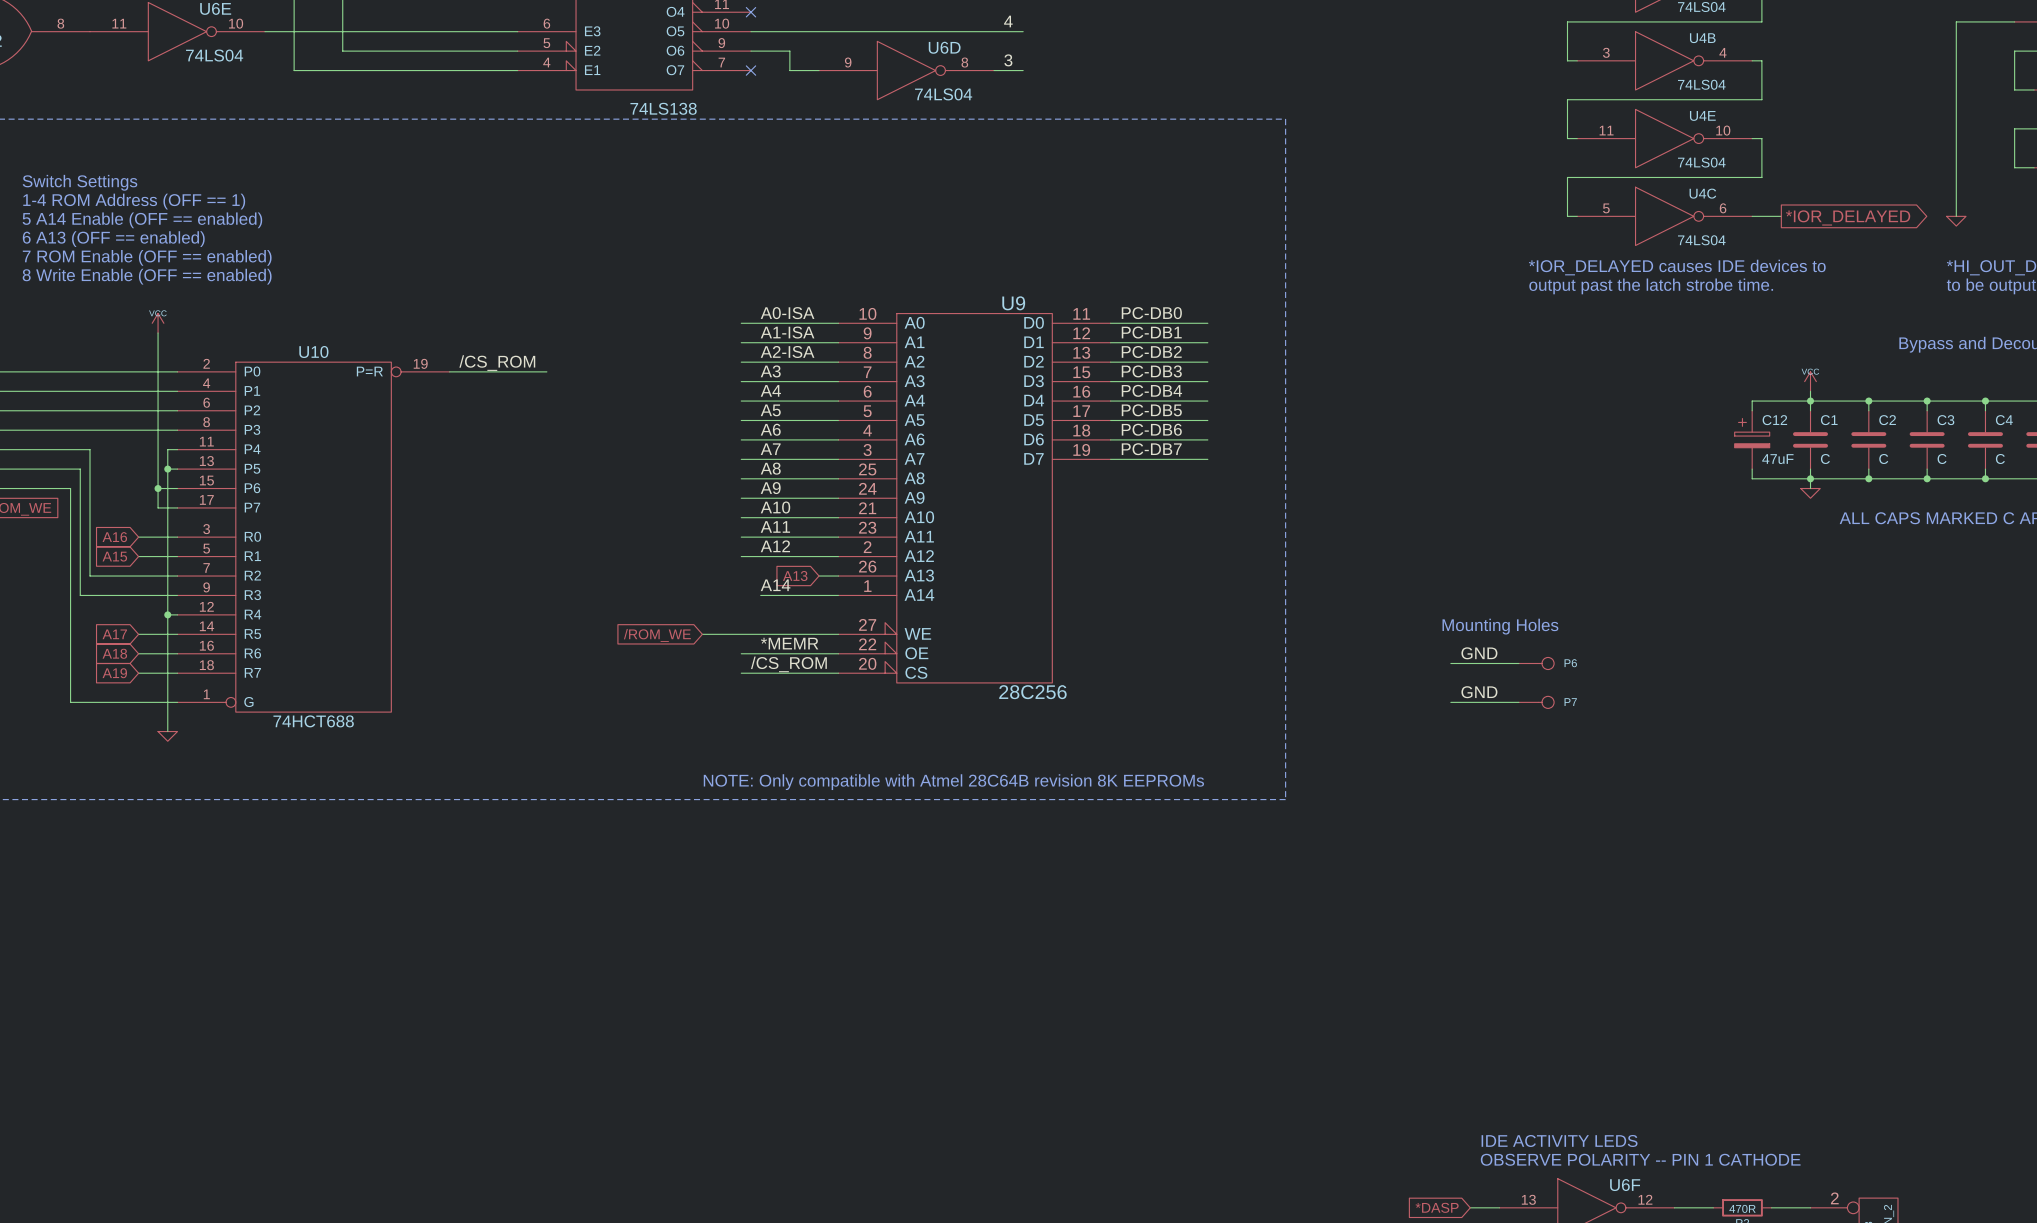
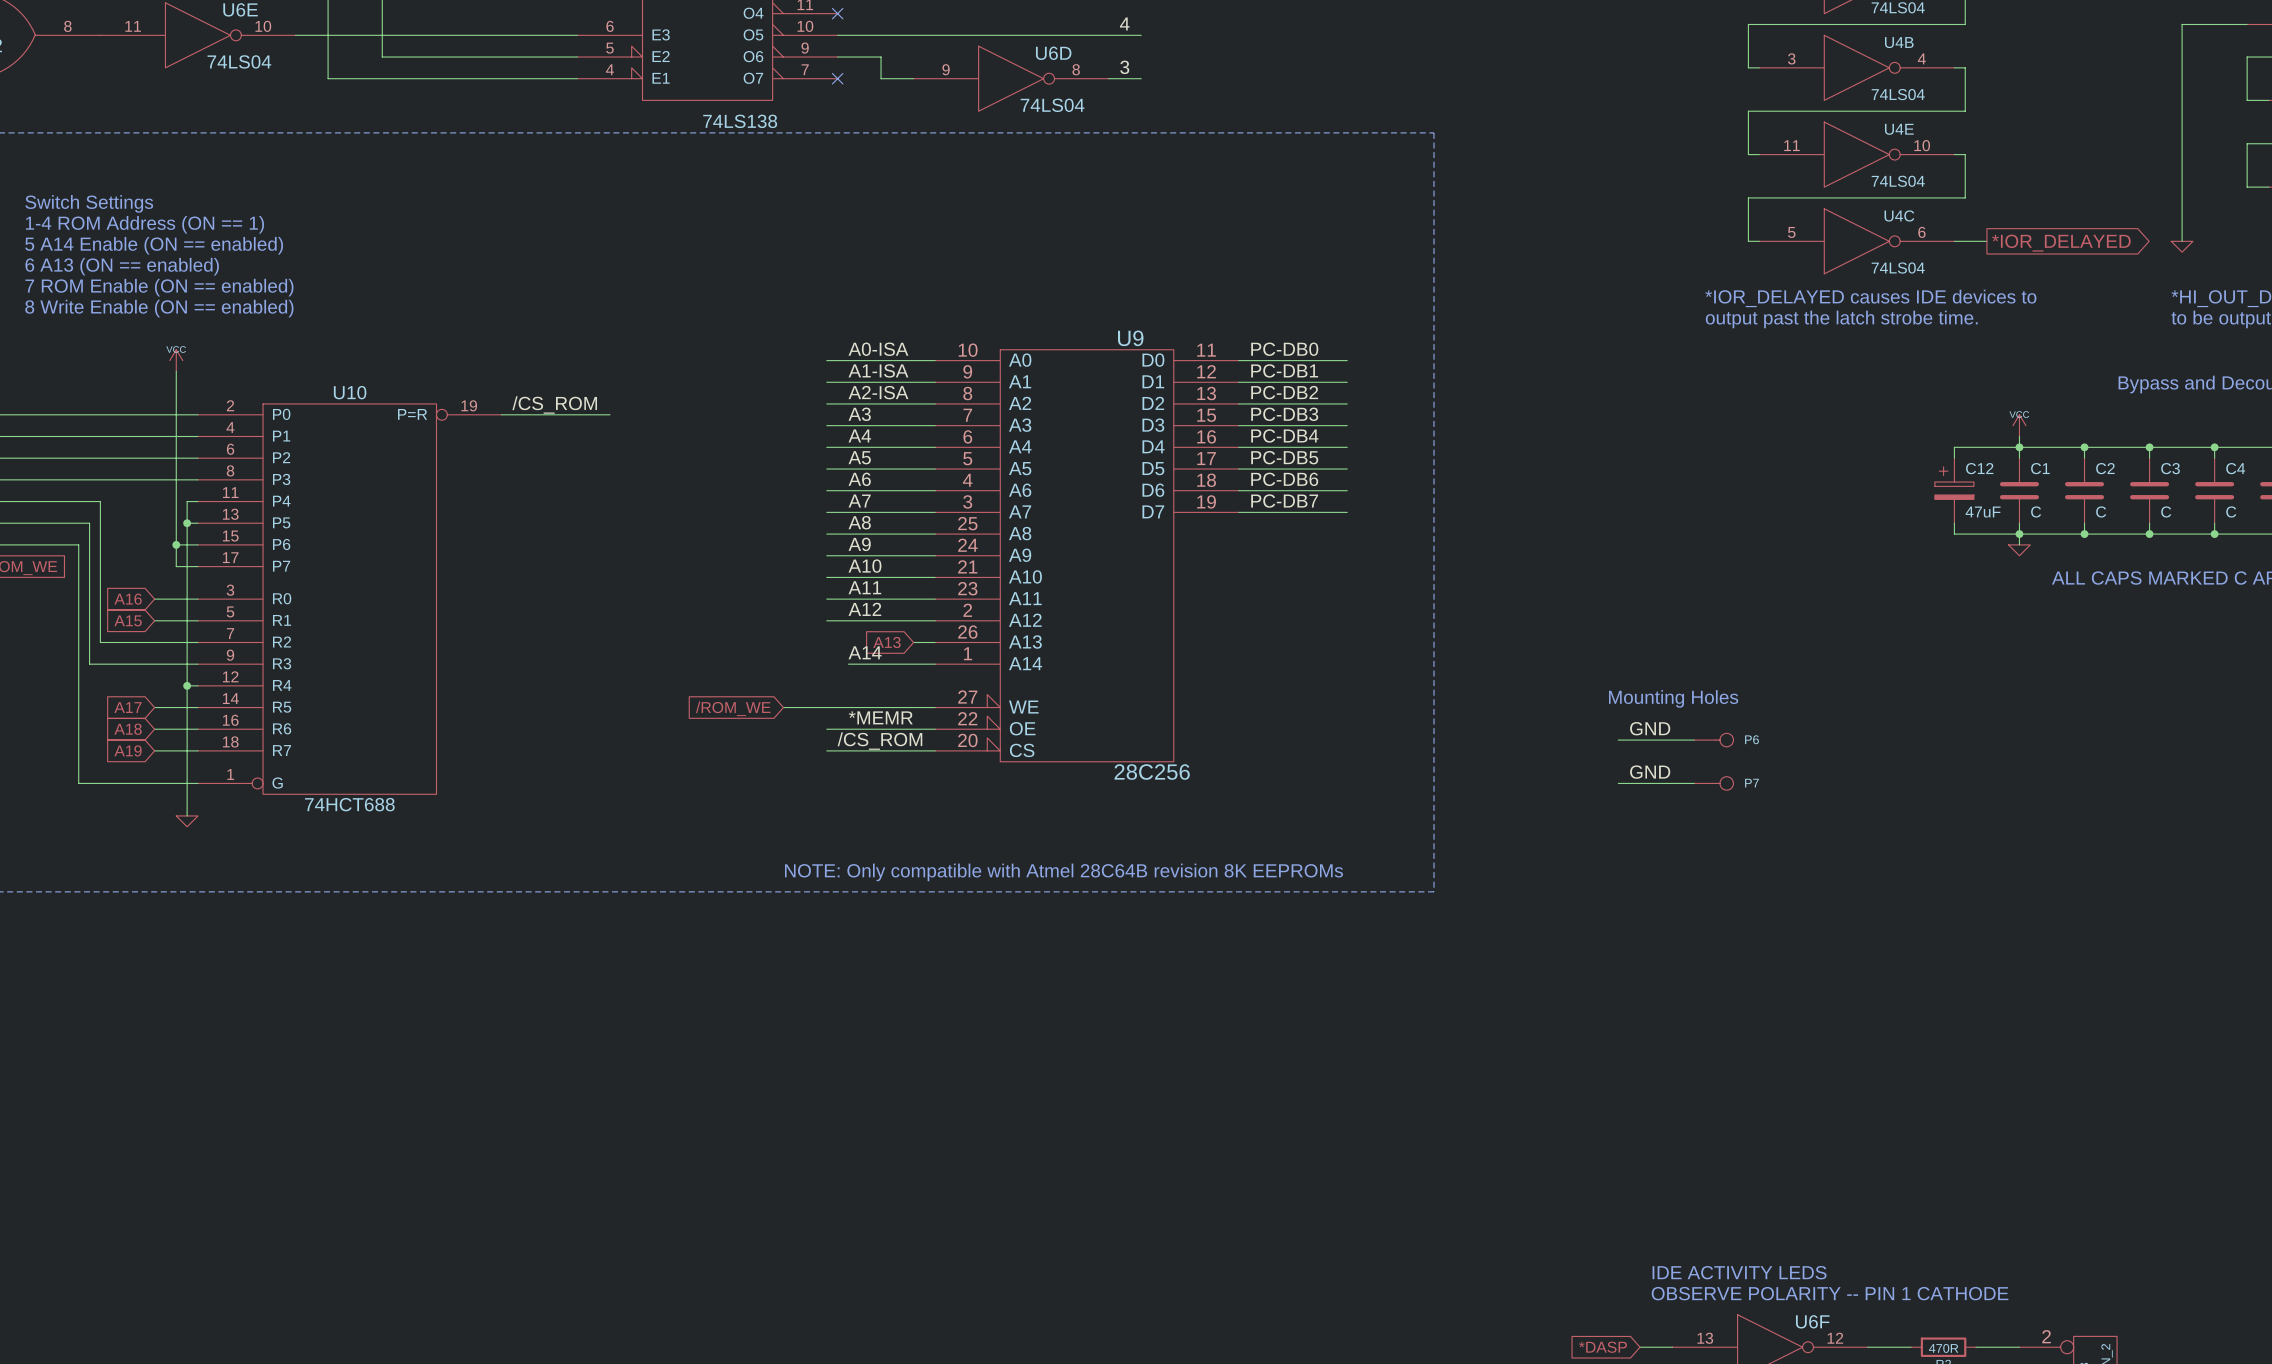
text: 1-4 ROM Address (OFF == 1) (134, 201) -> 1-4 ROM Address (ON == 1) (144, 224)
text: 5 A14 Enable (OFF == enabled) (142, 220) -> 5 A14 Enable (ON == enabled) (154, 245)
text: 6 A13 (OFF == enabled) (113, 239) -> 6 A13 (ON == enabled) (122, 266)
text: 7 ROM Enable (OFF == enabled) (147, 257) -> 7 ROM Enable (ON == enabled) (159, 287)
text: 8 Write Enable (OFF == enabled) (147, 276) -> 8 Write Enable (ON == enabled) (159, 308)

